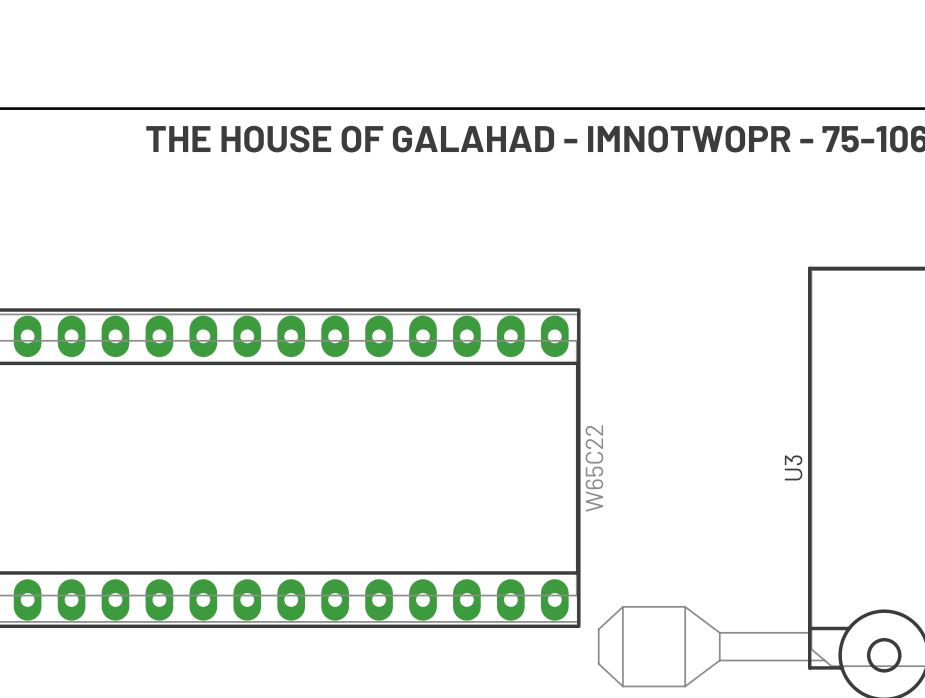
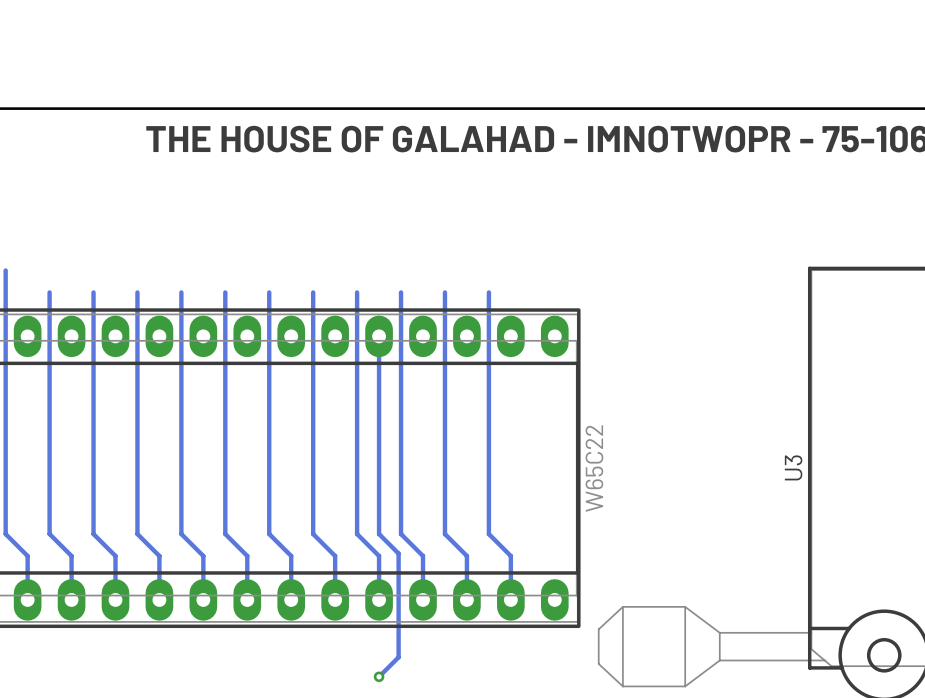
bottom track: none -> (5, 270) (5, 534) (27, 556) (27, 588)
bottom track: none -> (49, 292) (49, 534) (71, 556) (71, 588)
bottom track: none -> (93, 292) (93, 534) (115, 556) (115, 588)
bottom track: none -> (137, 292) (137, 534) (159, 556) (159, 588)
bottom track: none -> (181, 292) (181, 534) (203, 556) (203, 588)
bottom track: none -> (225, 292) (225, 534) (247, 556) (247, 588)
bottom track: none -> (269, 292) (269, 534) (291, 556) (291, 588)
bottom track: none -> (313, 292) (313, 534) (335, 556) (335, 588)
bottom track: none -> (357, 292) (357, 534) (379, 556) (379, 588)
bottom track: none -> (401, 292) (401, 534) (422, 556) (422, 588)
bottom track: none -> (444, 292) (444, 534) (466, 556) (466, 588)
bottom track: none -> (488, 292) (488, 534) (510, 556) (510, 588)
bottom track: none -> (379, 325) (379, 534) (398, 553) (398, 657) (379, 676)
via: none -> (379, 676)

